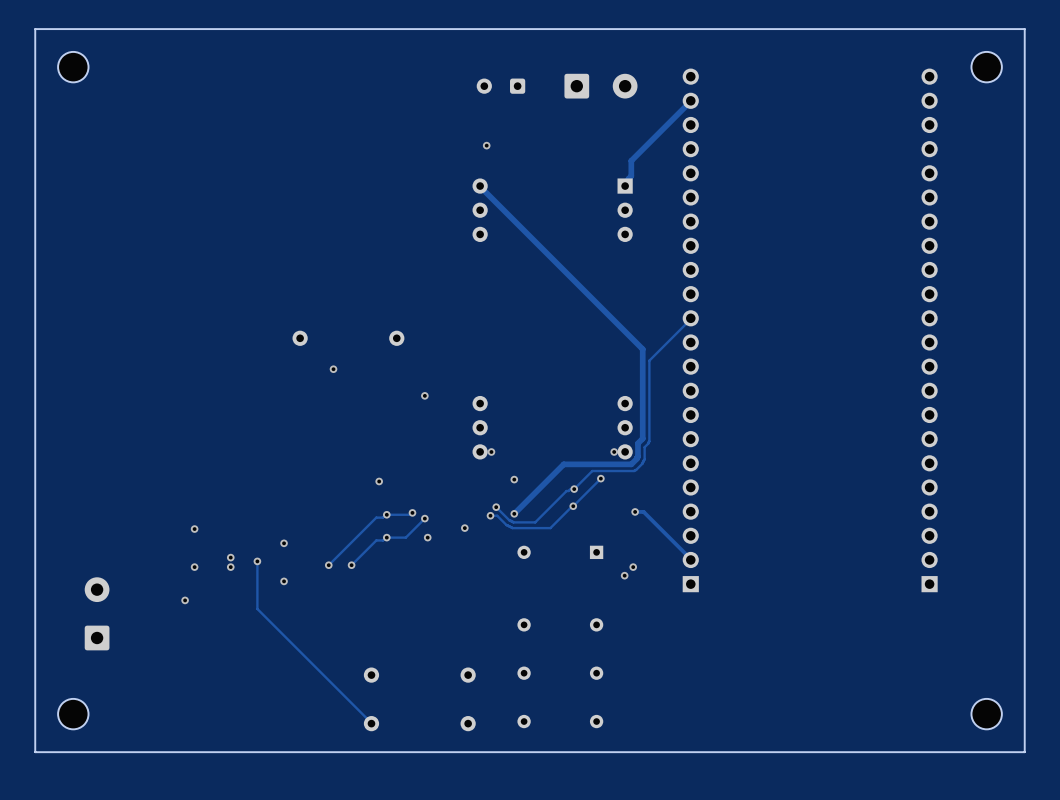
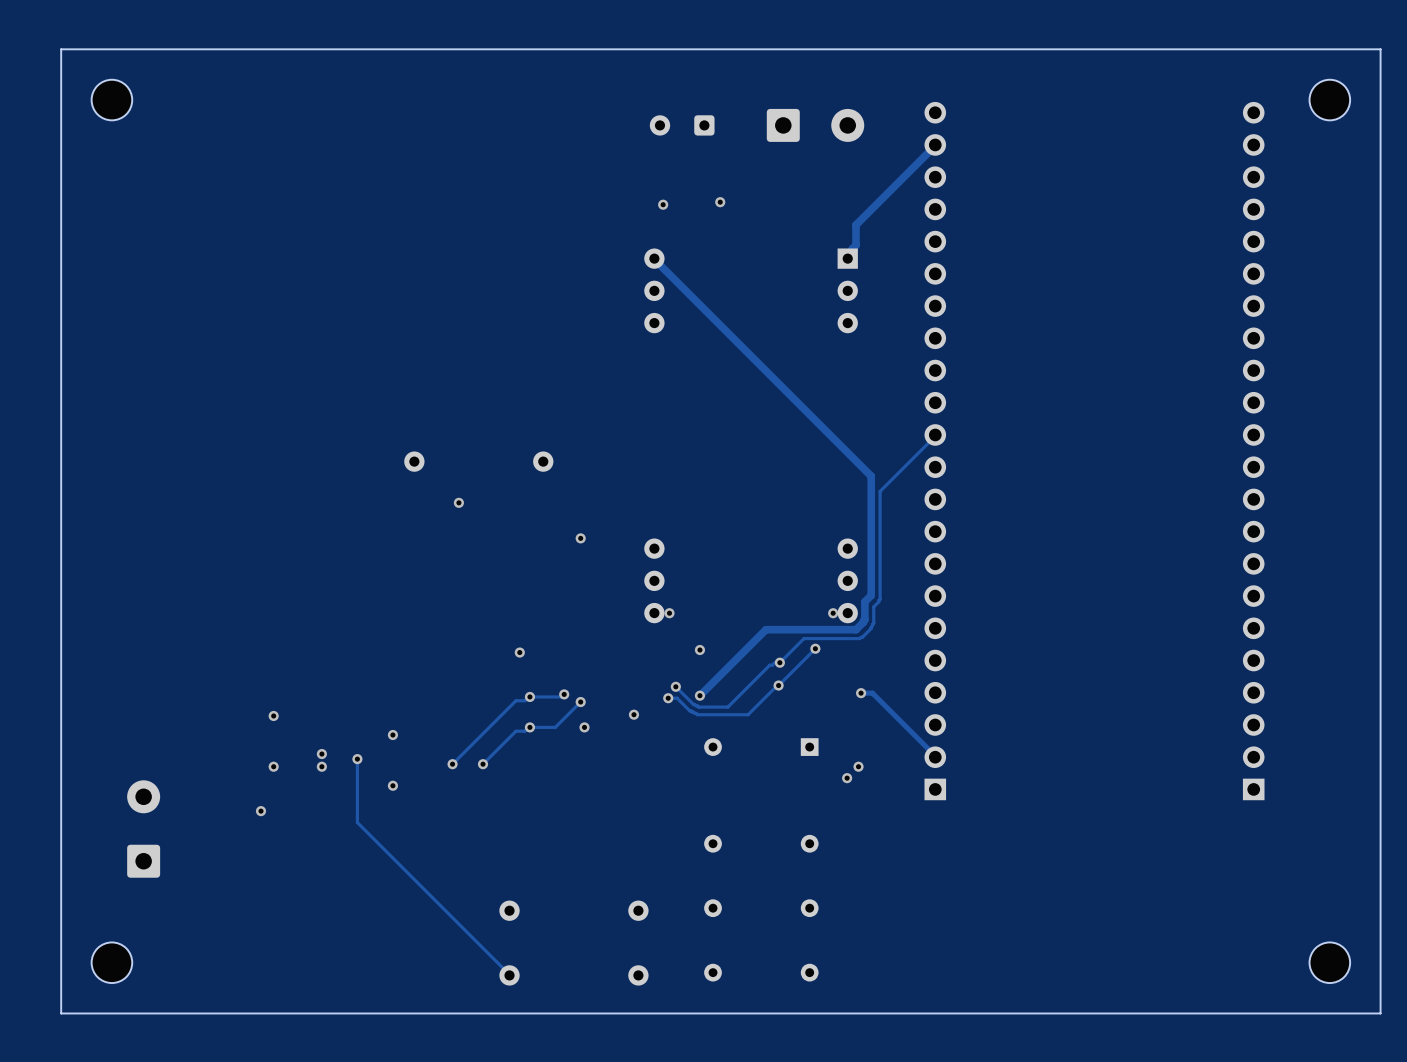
via: none -> (720, 202)

